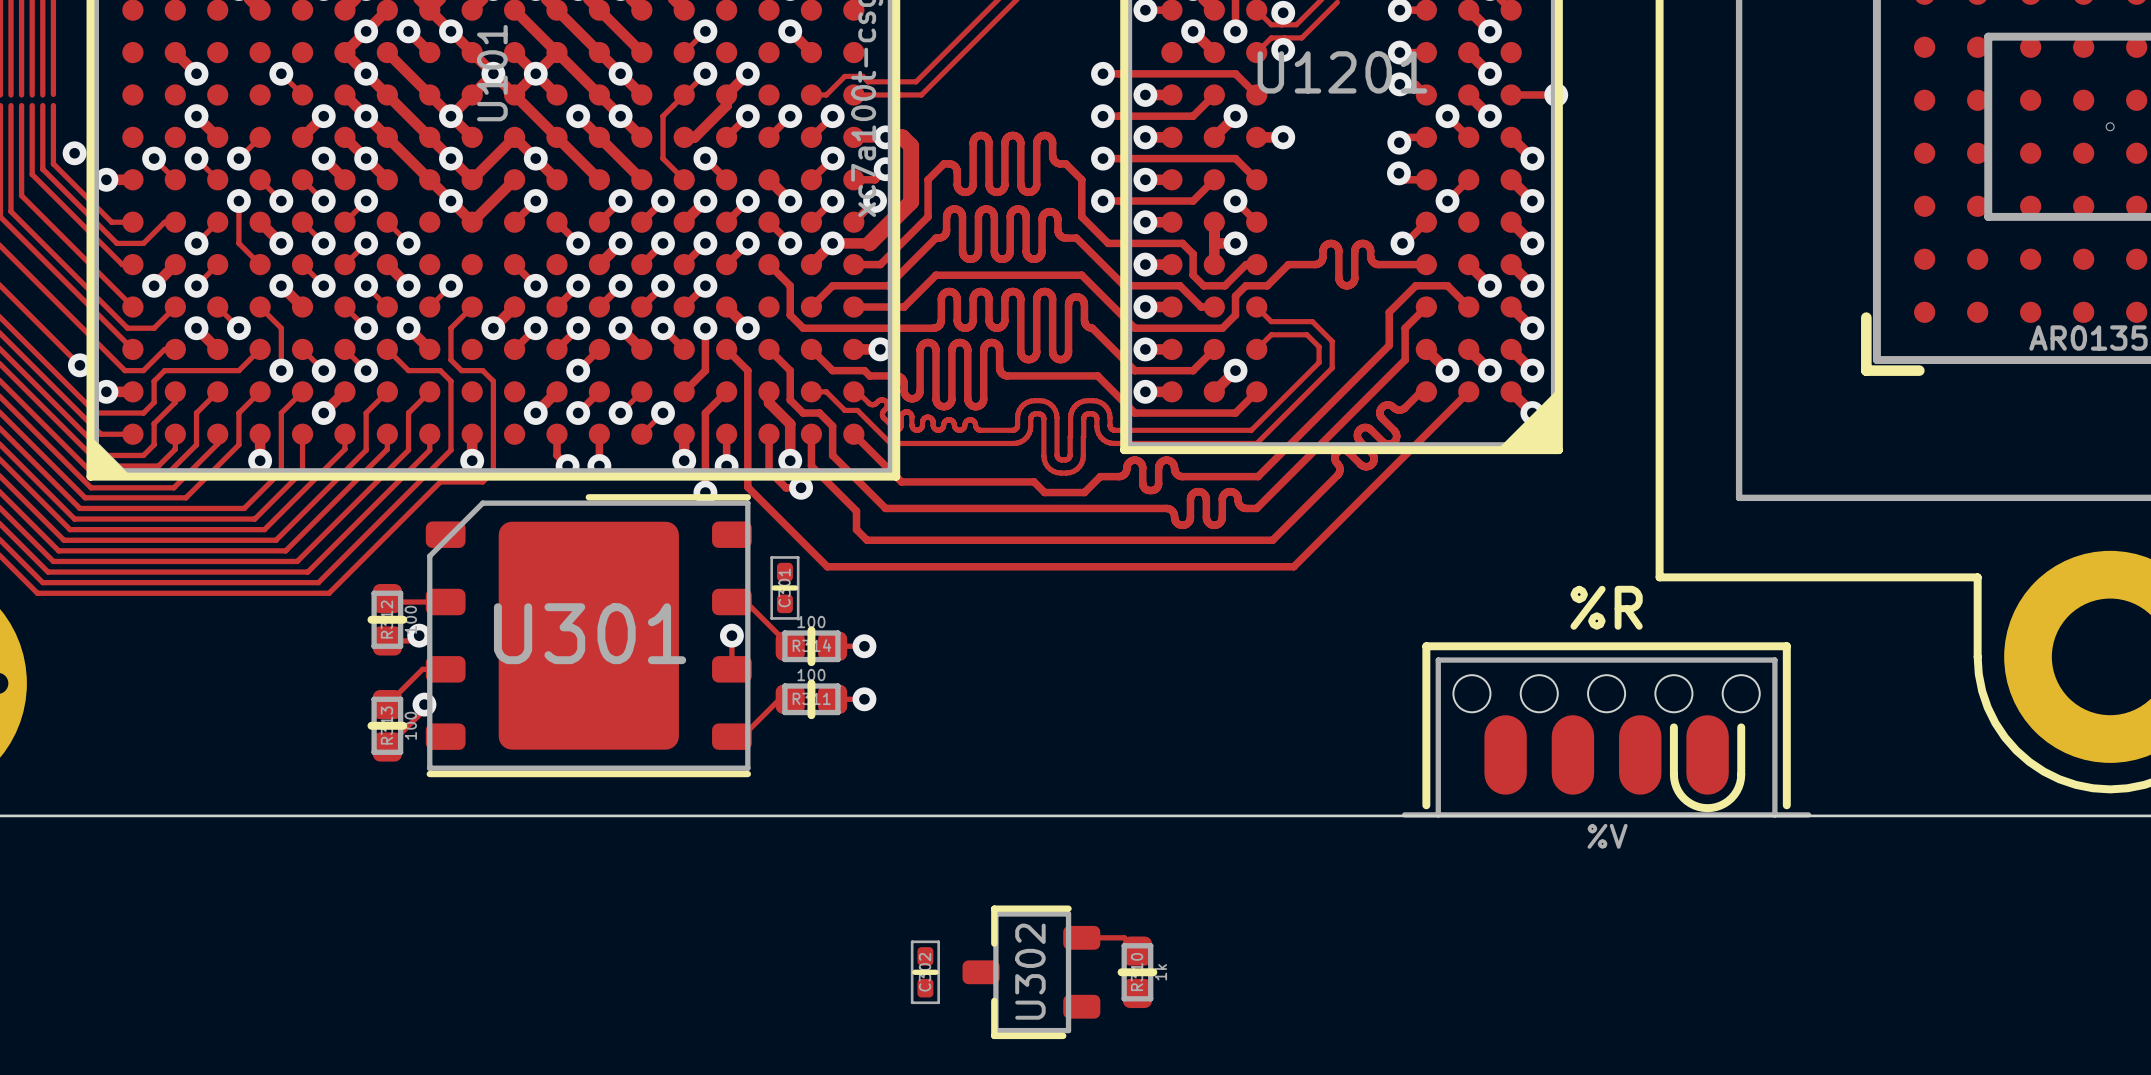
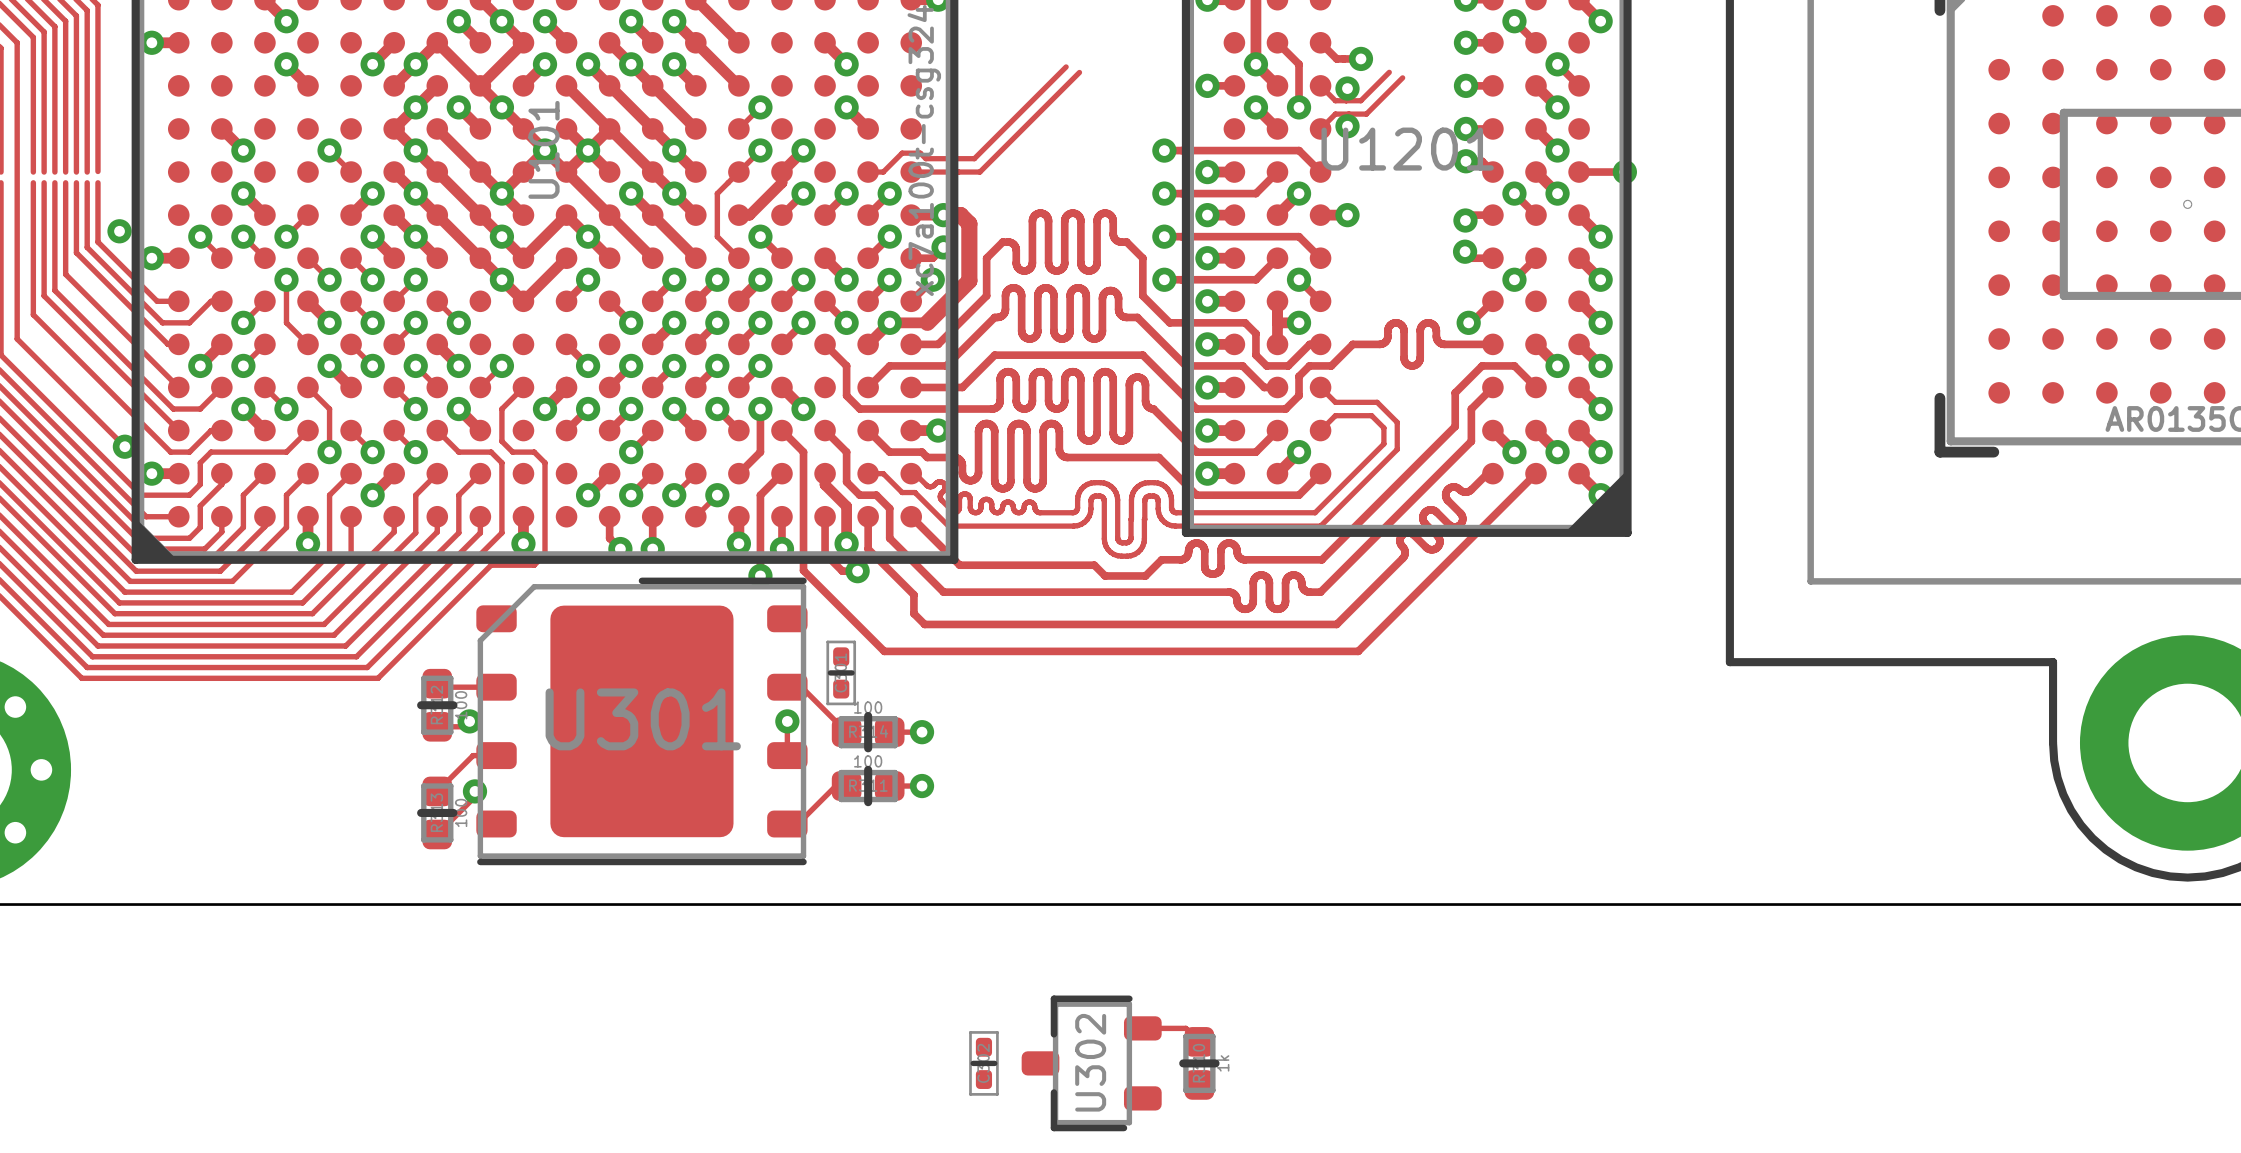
%R: %V (1606, 729) -> none

